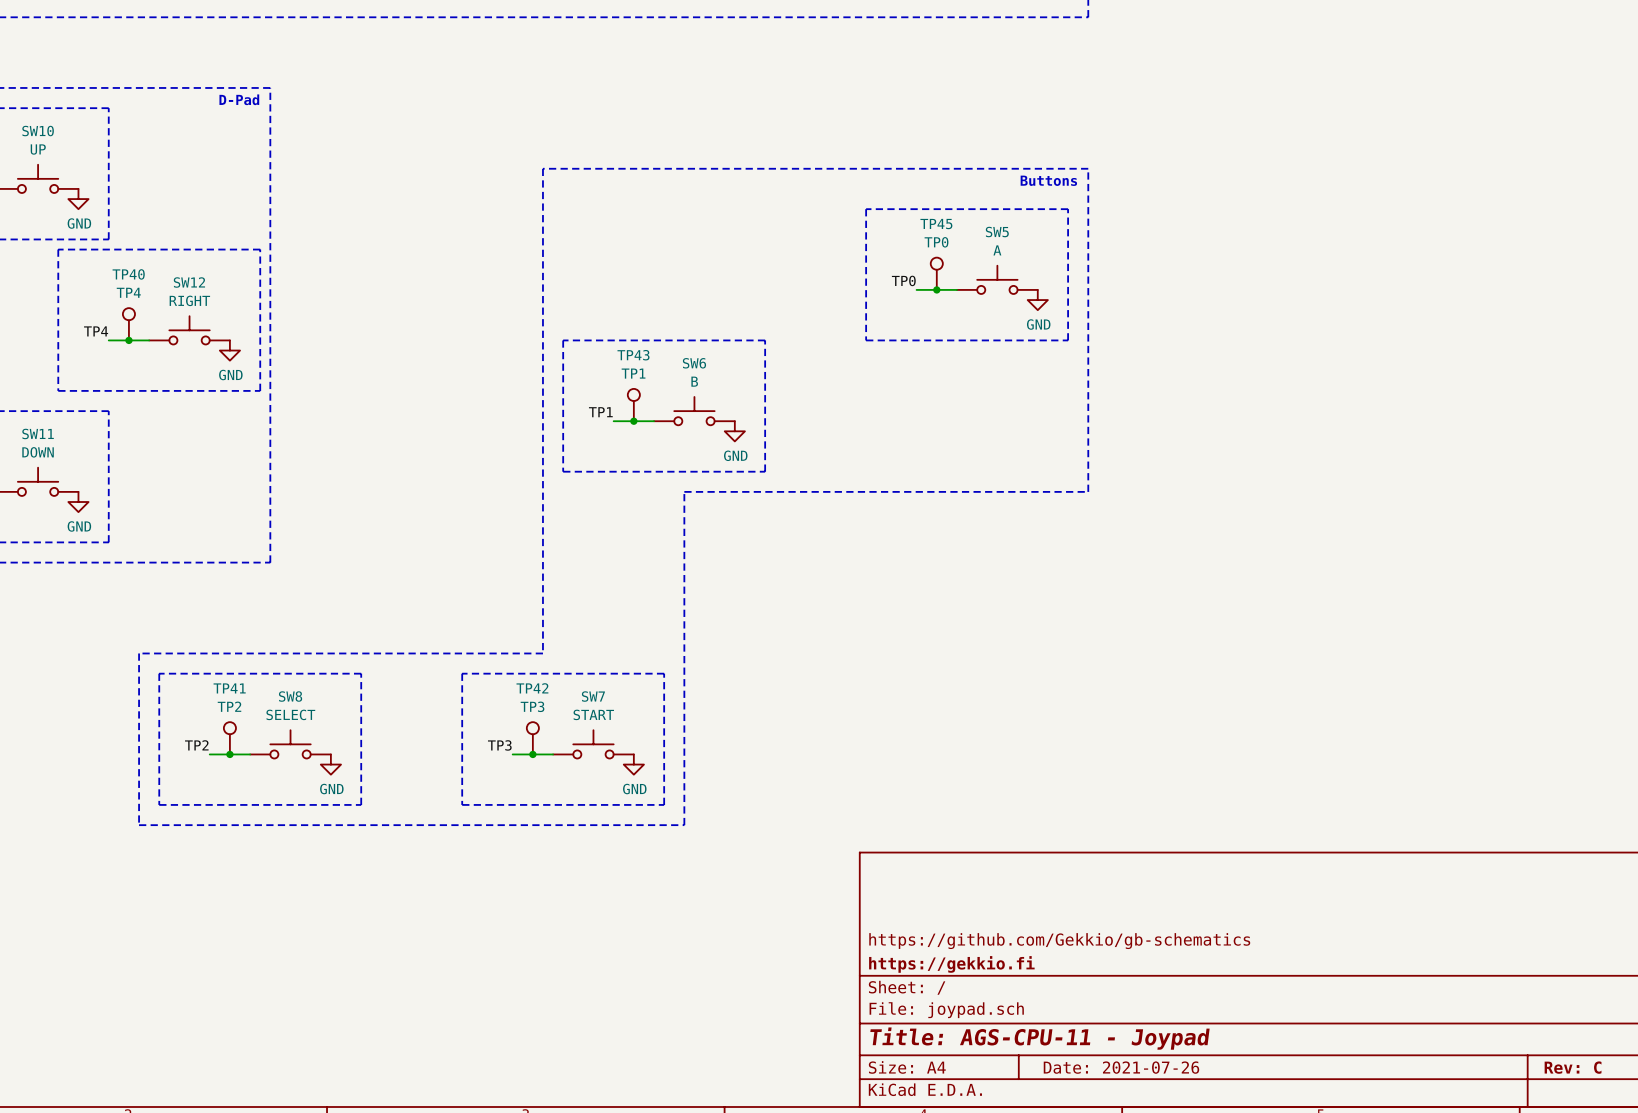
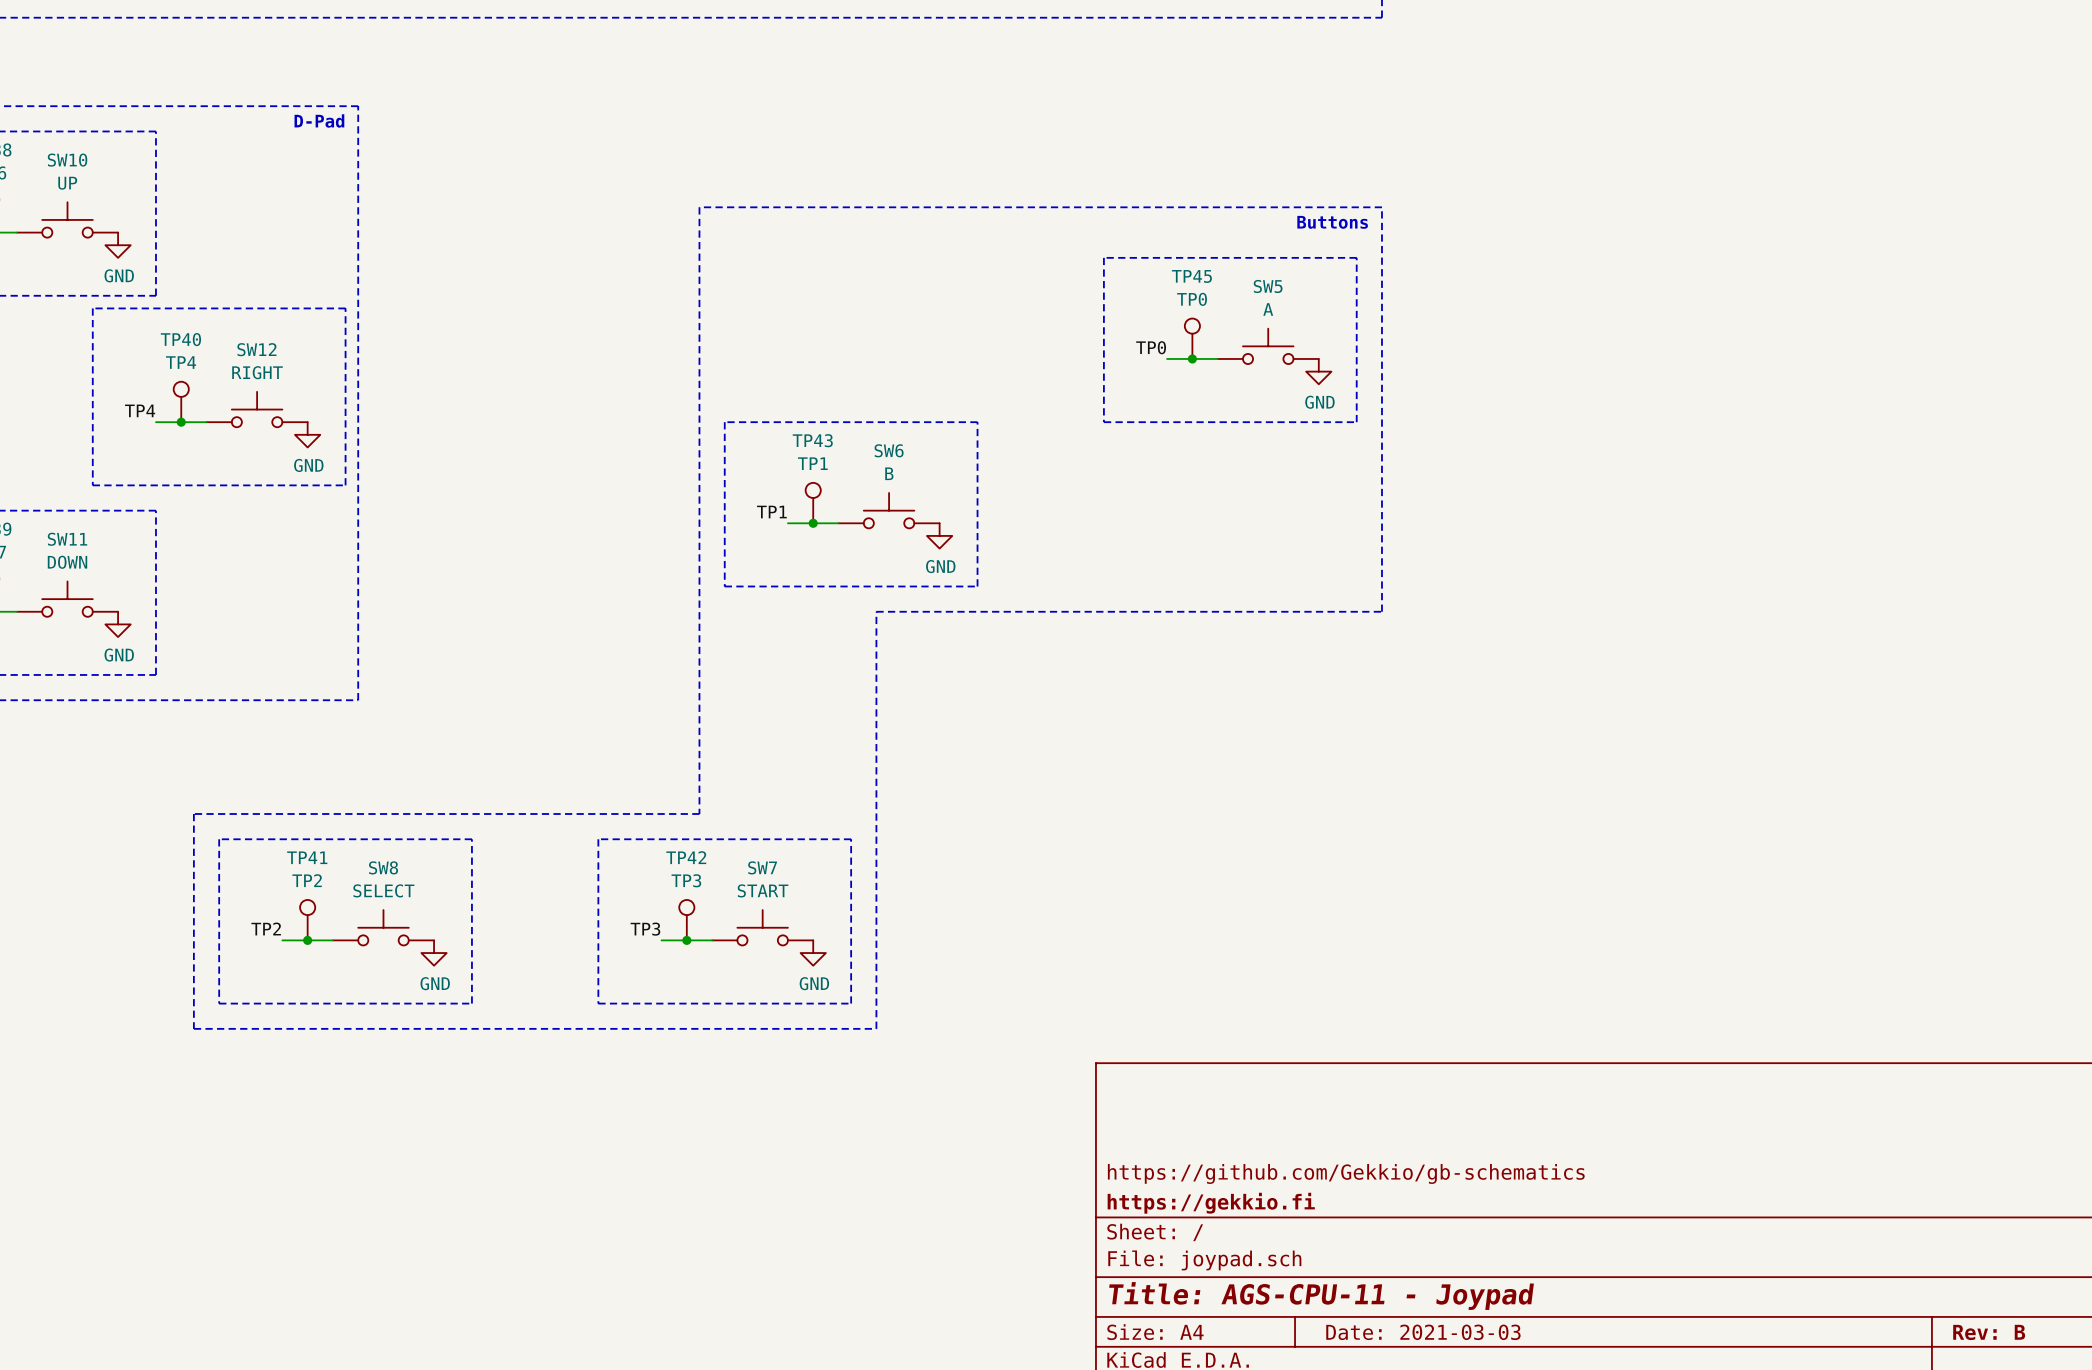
title block: Date: 2021-07-26 (1121, 1067) -> Date: 2021-03-03 (1423, 1332)
title block: Rev: C (1573, 1067) -> Rev: B (1989, 1332)

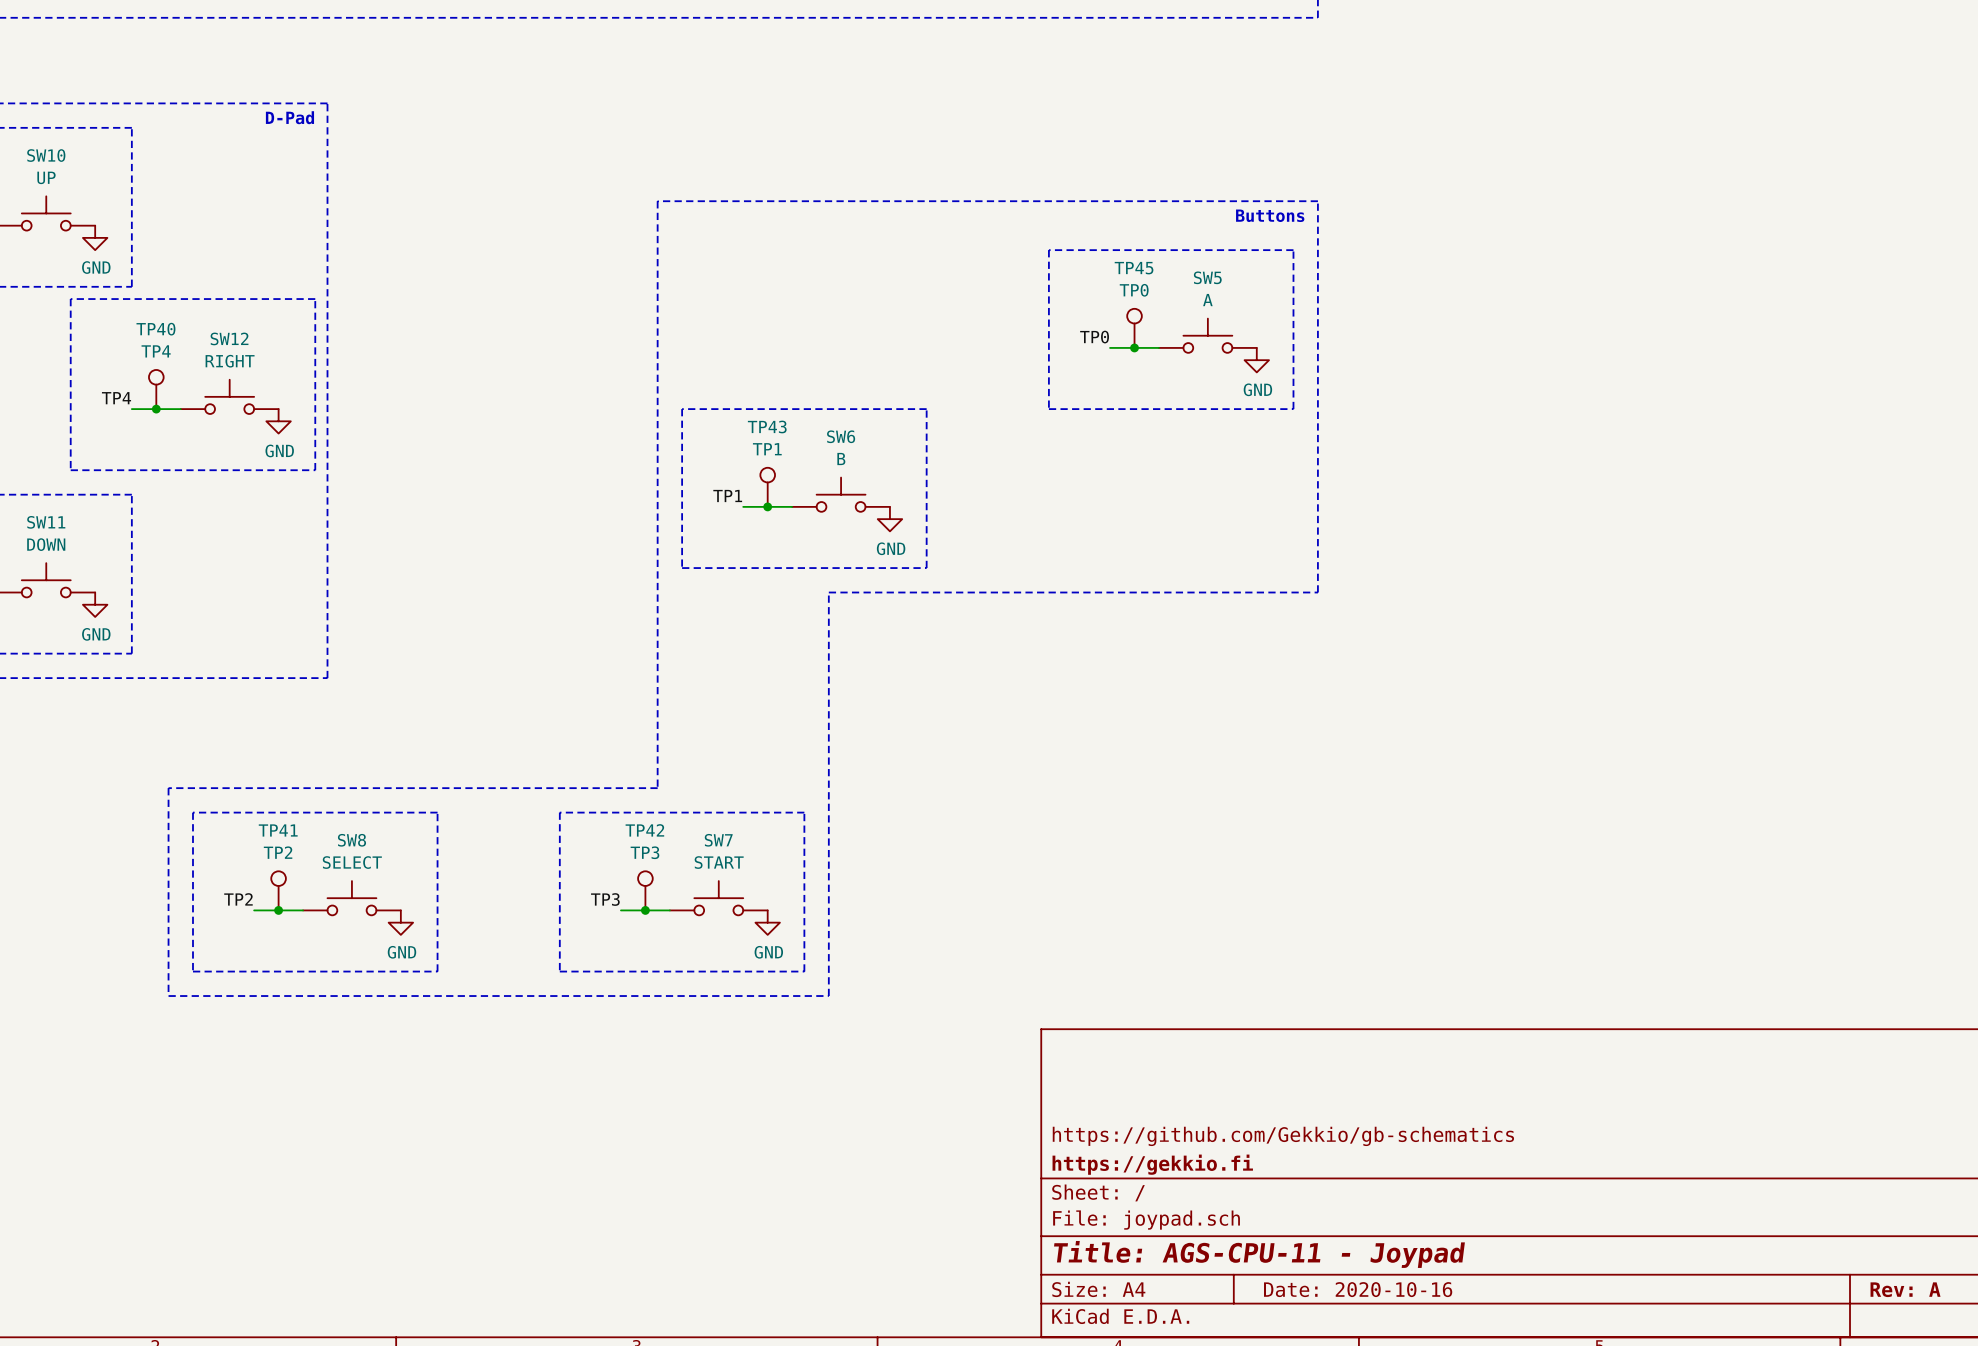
title block: Date: 2021-03-03 (1423, 1332) -> Date: 2020-10-16 (1358, 1289)
title block: Rev: B (1989, 1332) -> Rev: A (1905, 1289)

